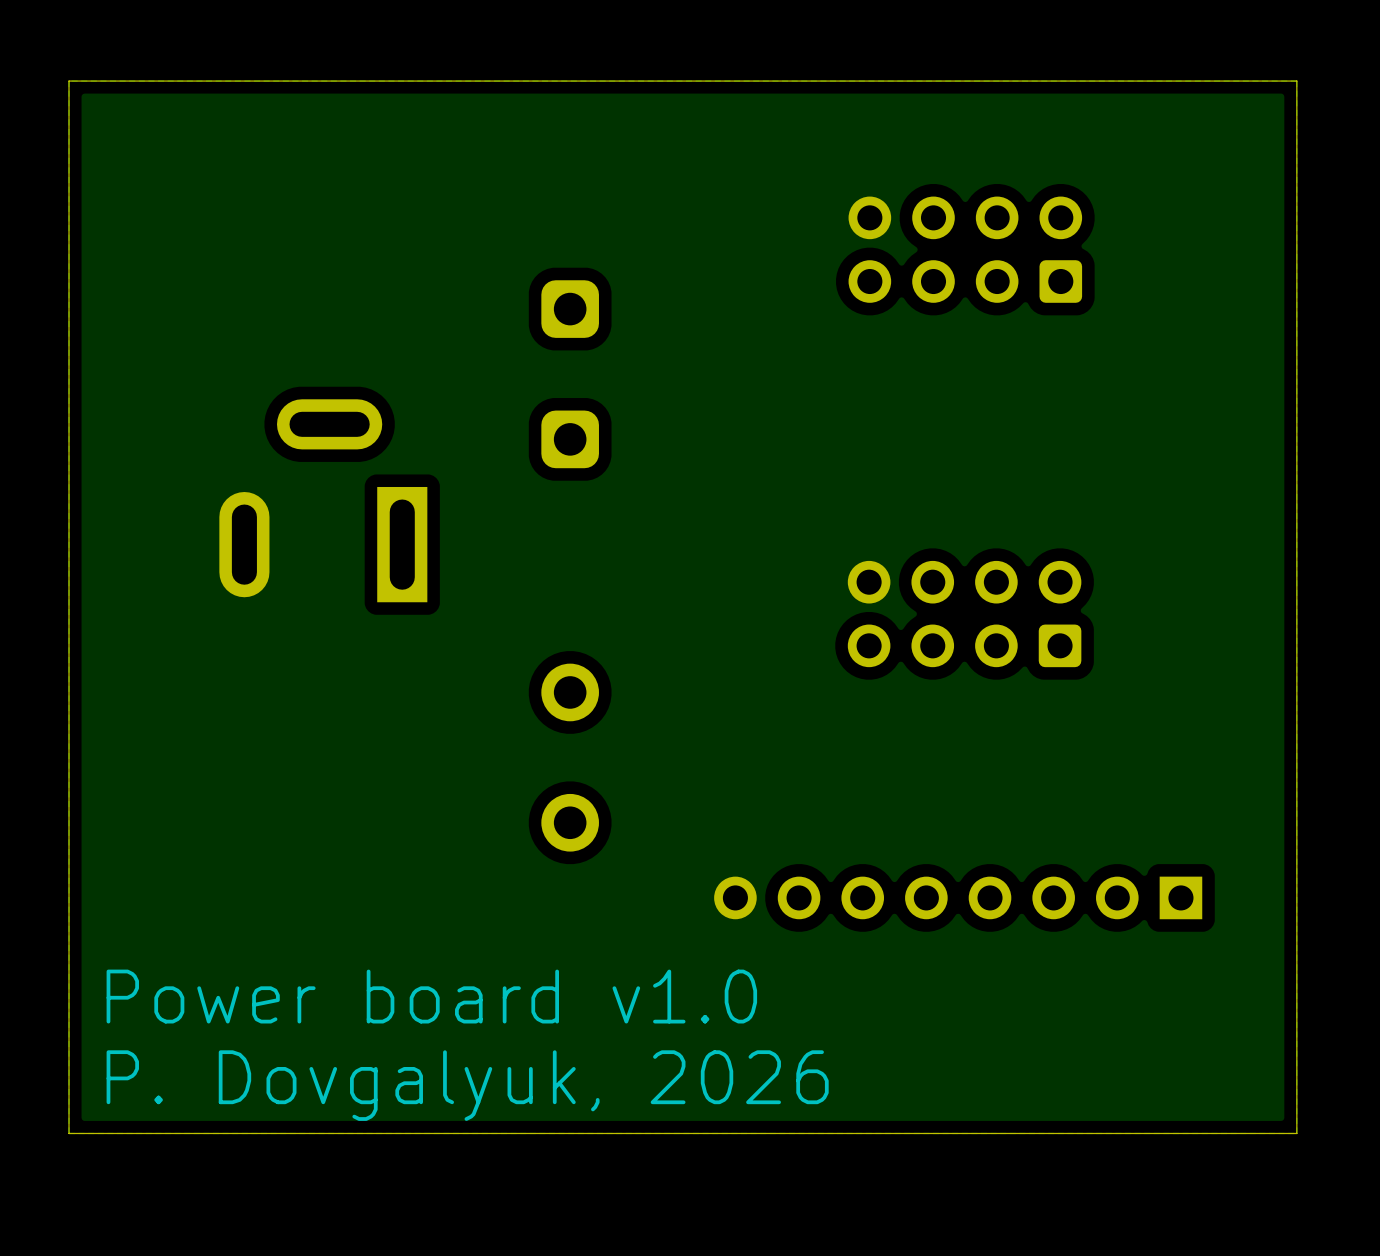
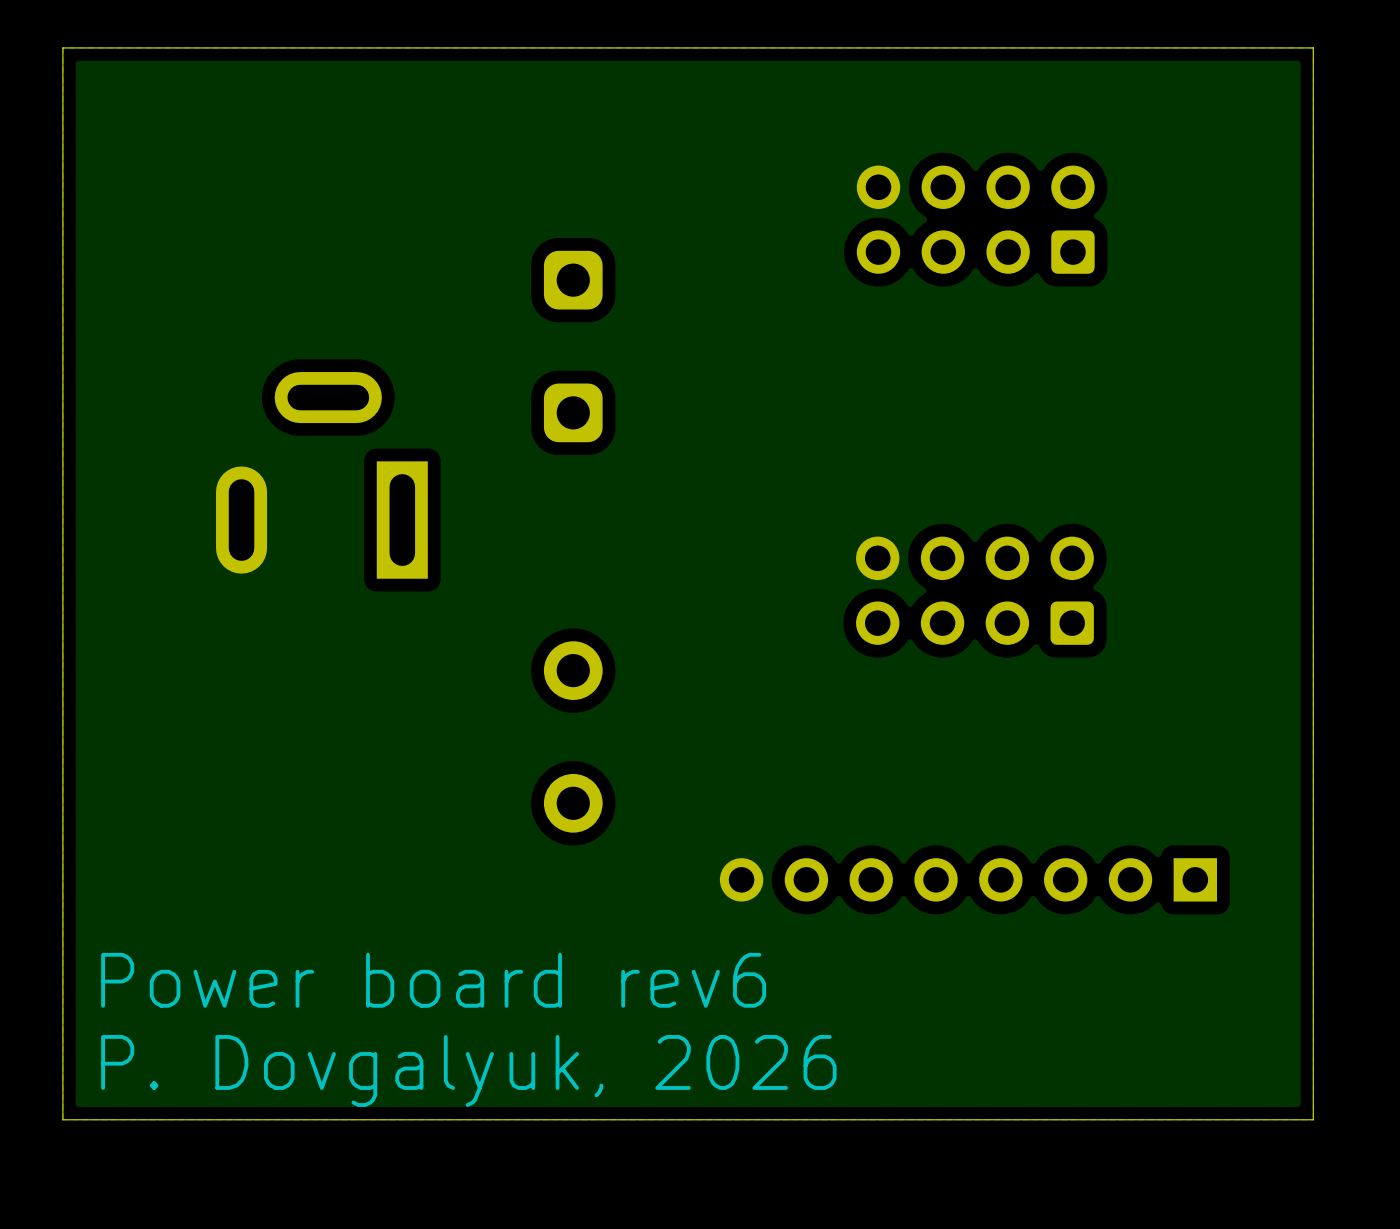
text: Power board v1.0 (431, 996) -> Power board rev6 (433, 980)

